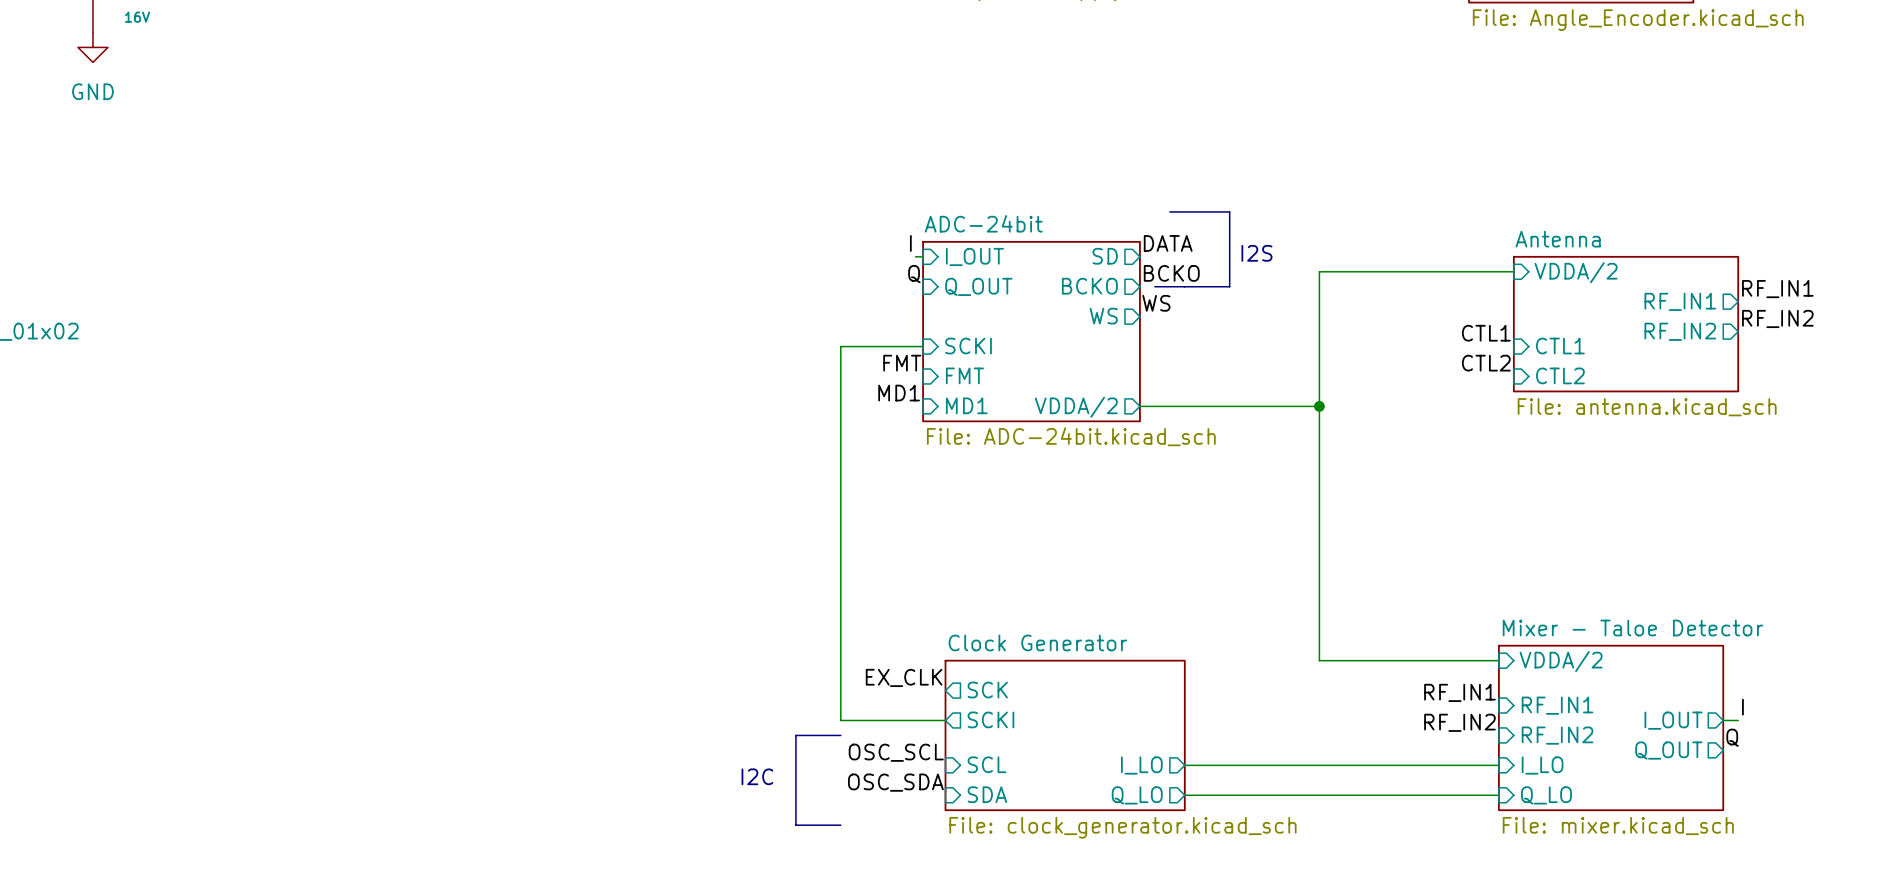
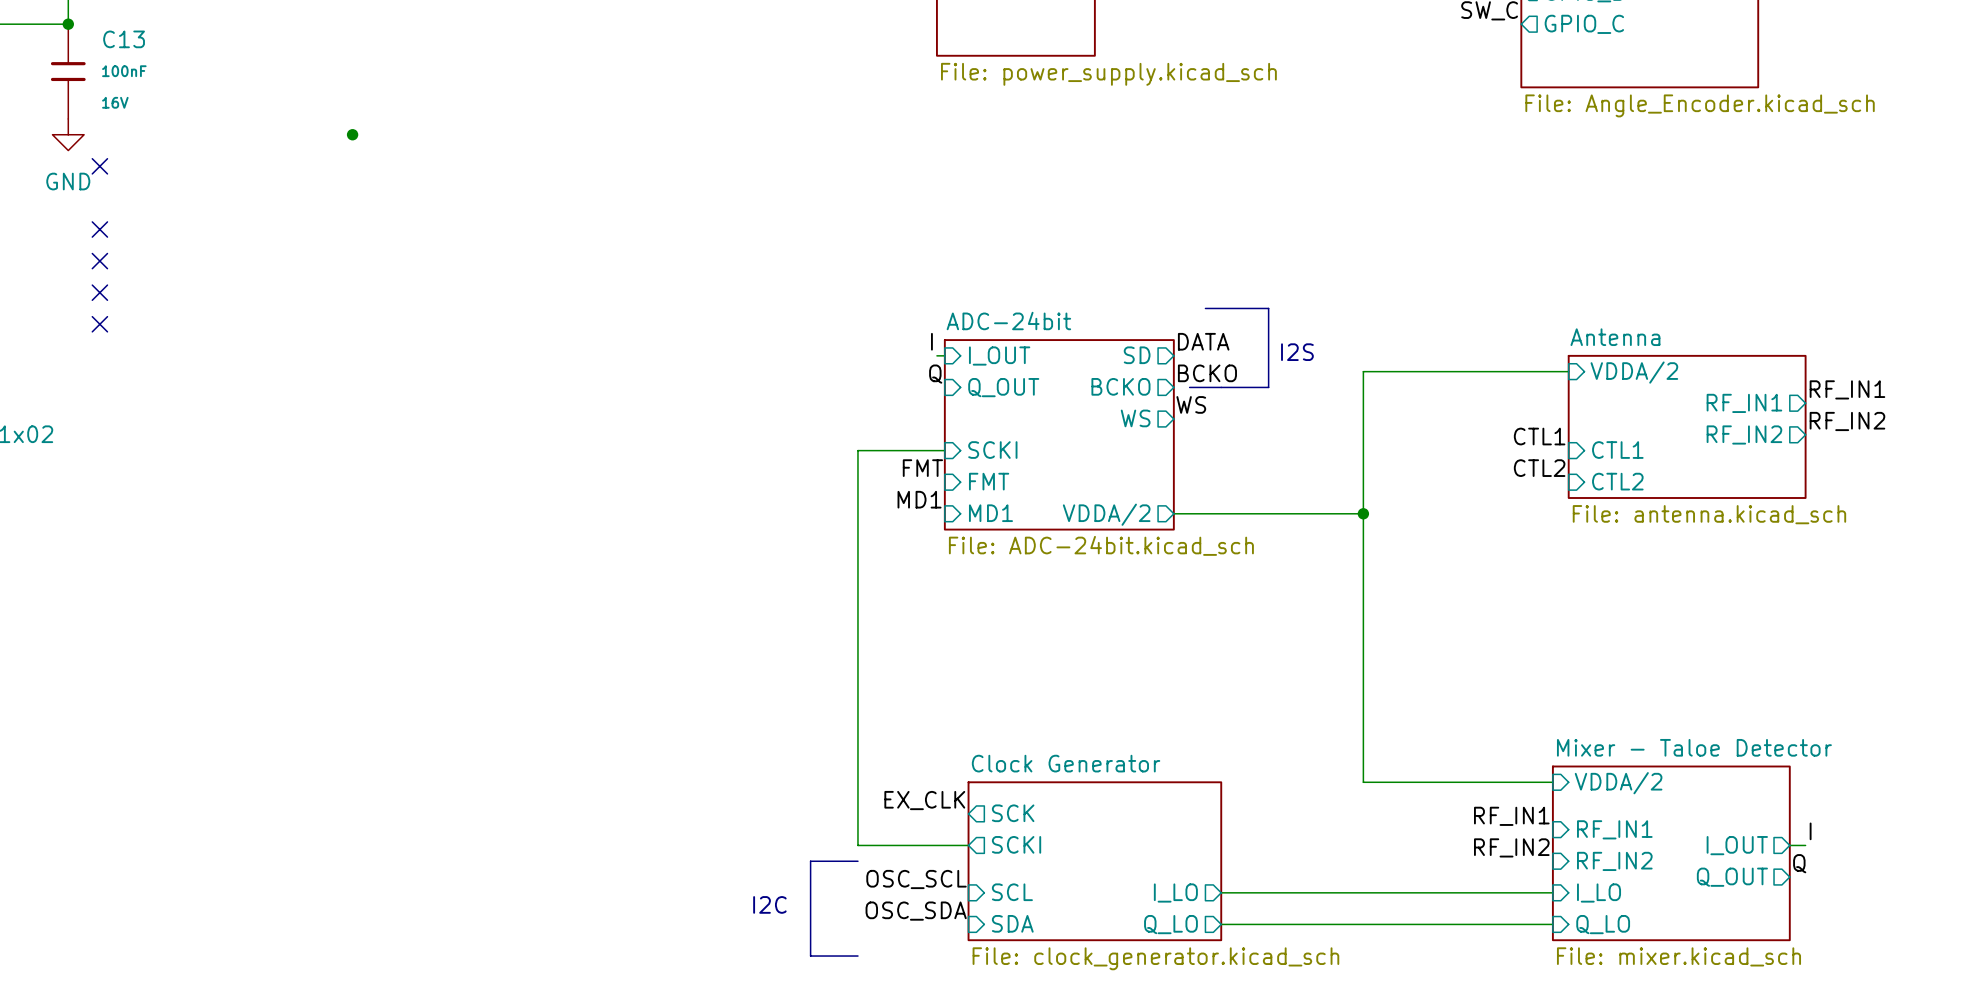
junction: none -> (352, 134)
no-connect mark: none -> (99, 166)
no-connect mark: none -> (99, 229)
no-connect mark: none -> (99, 261)
no-connect mark: none -> (99, 292)
no-connect mark: none -> (99, 324)

